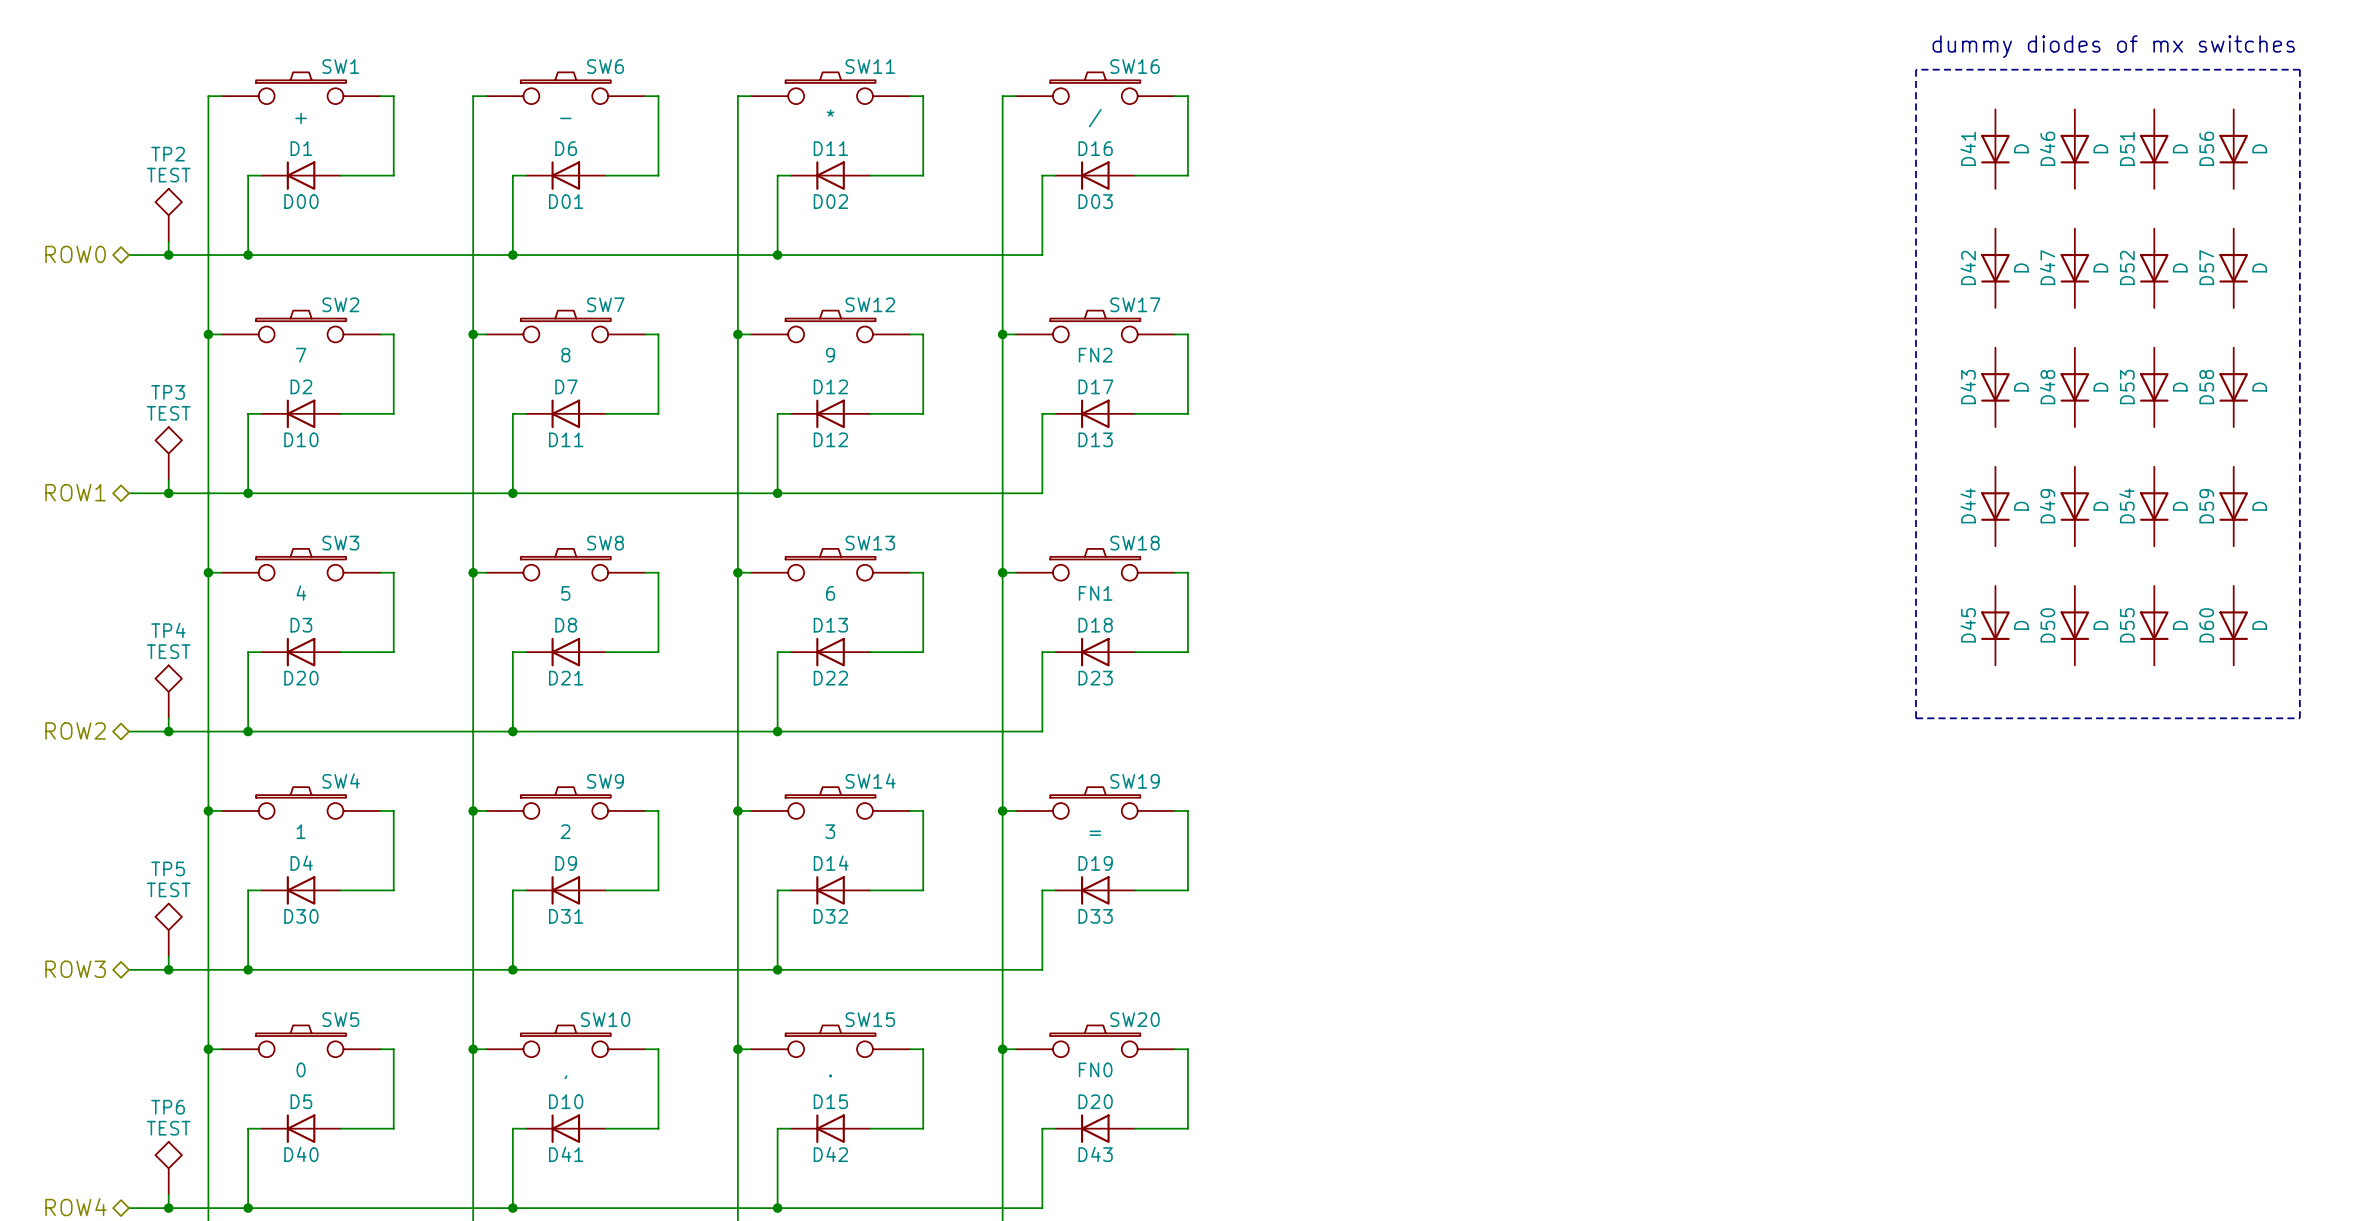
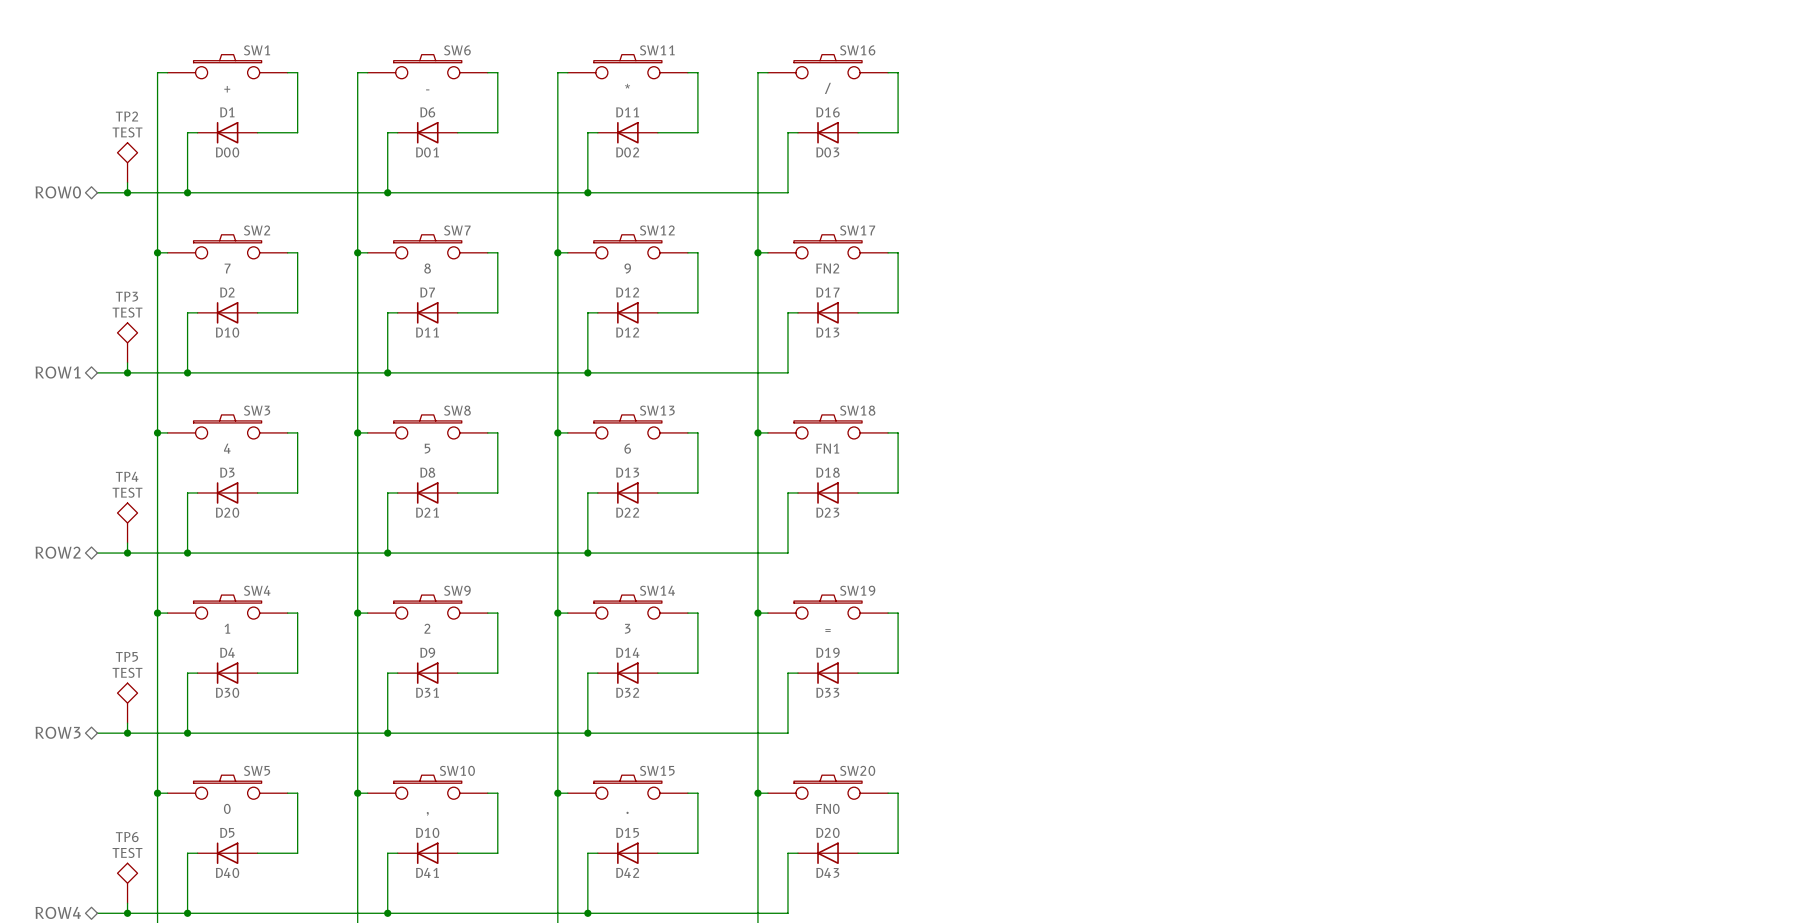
text: dummy diodes of mx switches (2113, 46) -> none
line: (1916, 69) (1916, 718) (2299, 718) (2299, 69) (1916, 69) -> none
D41: D (1995, 149) -> none
D46: D (2074, 149) -> none
D51: D (2154, 149) -> none
D56: D (2233, 149) -> none
D42: D (1995, 268) -> none
D47: D (2074, 268) -> none
D52: D (2154, 268) -> none
D57: D (2233, 268) -> none
D43: D (1995, 387) -> none
D48: D (2074, 387) -> none
D53: D (2154, 387) -> none
D58: D (2233, 387) -> none
D44: D (1995, 506) -> none
D49: D (2074, 506) -> none
D54: D (2154, 506) -> none
D59: D (2233, 506) -> none
D45: D (1995, 625) -> none
D50: D (2074, 625) -> none
D55: D (2154, 625) -> none
D60: D (2233, 625) -> none

